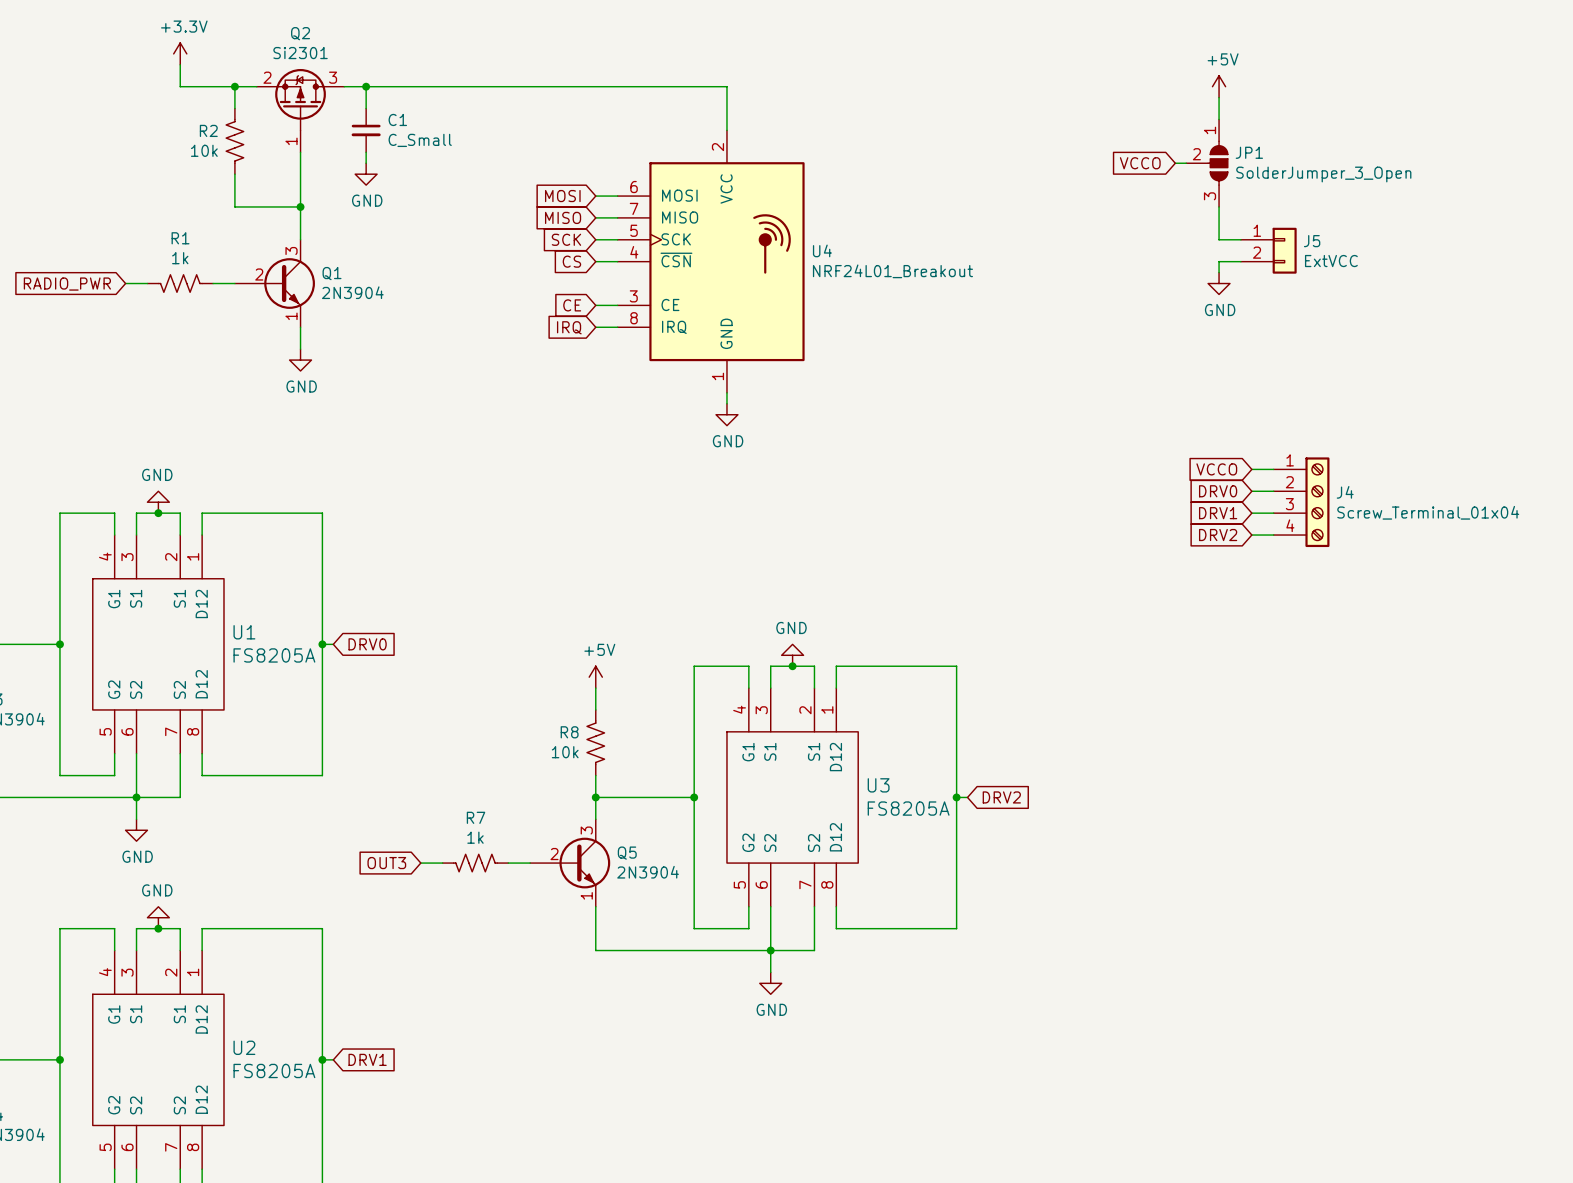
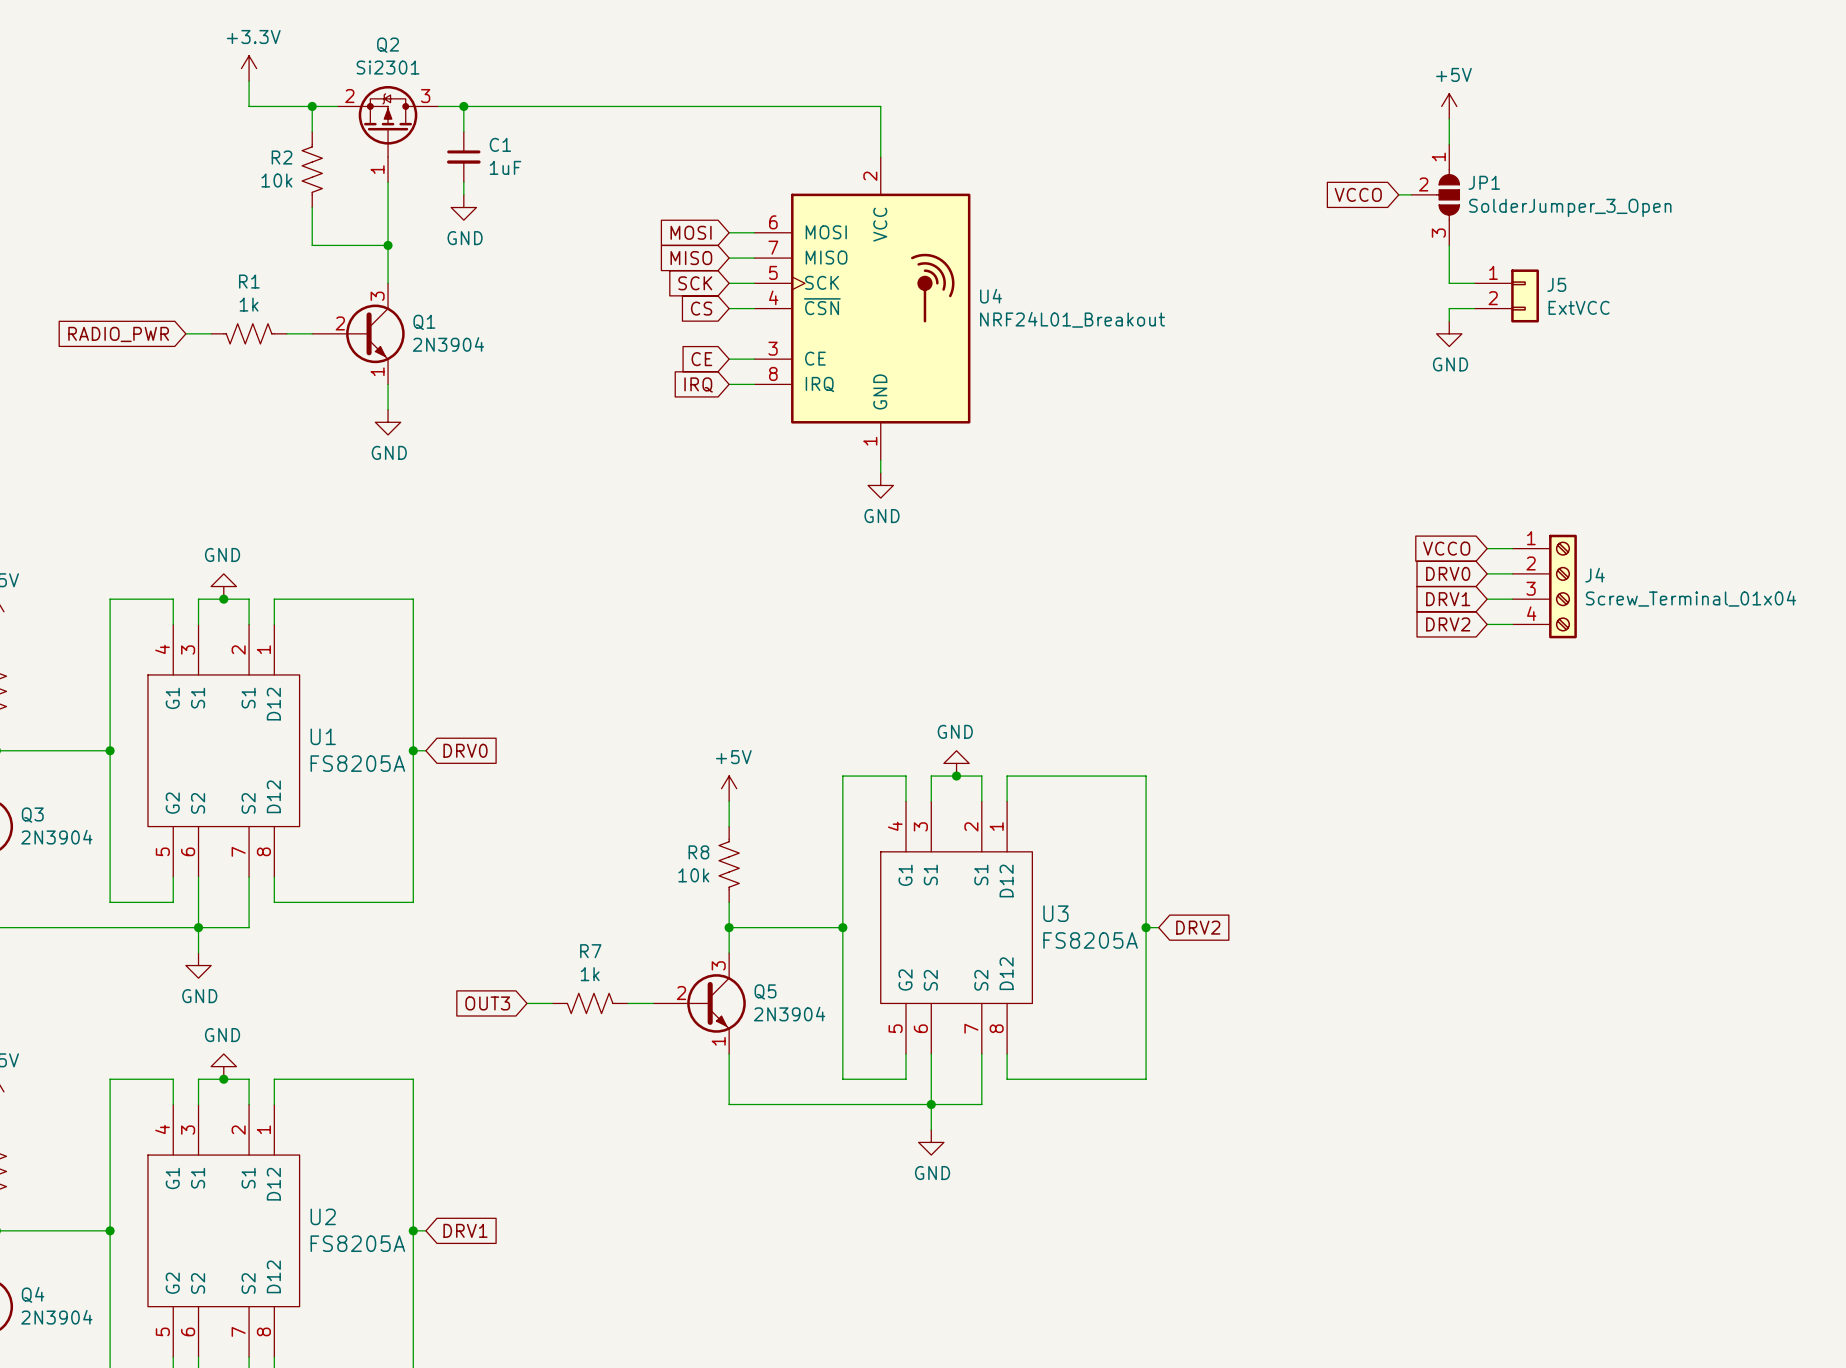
C1 value: C_Small (420, 140) -> 1uF (505, 167)

